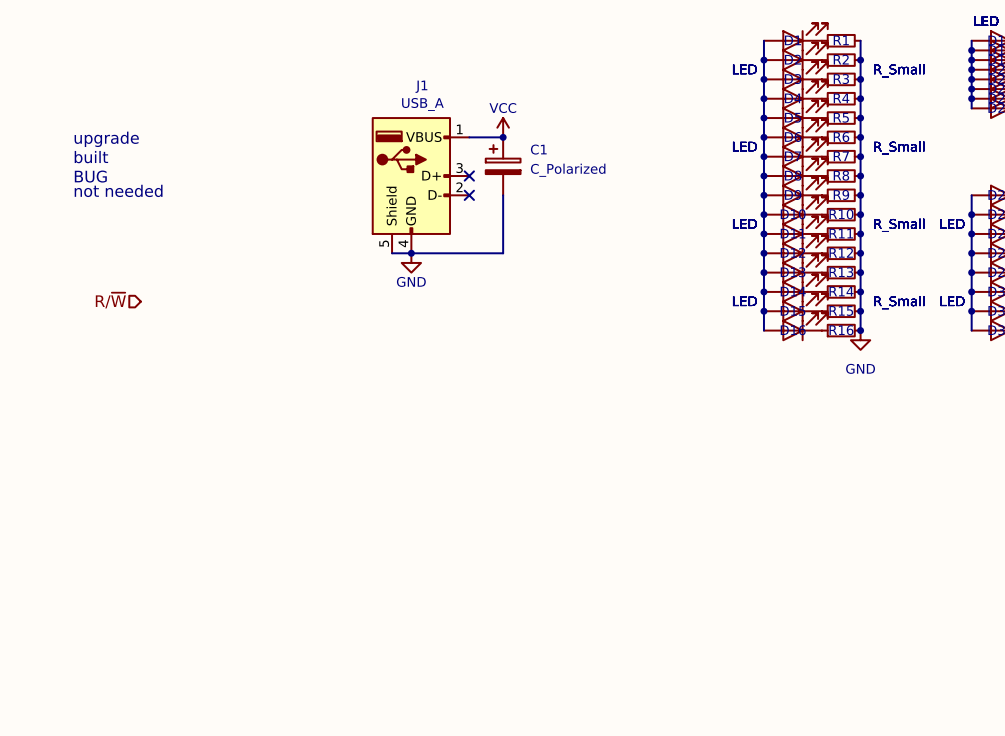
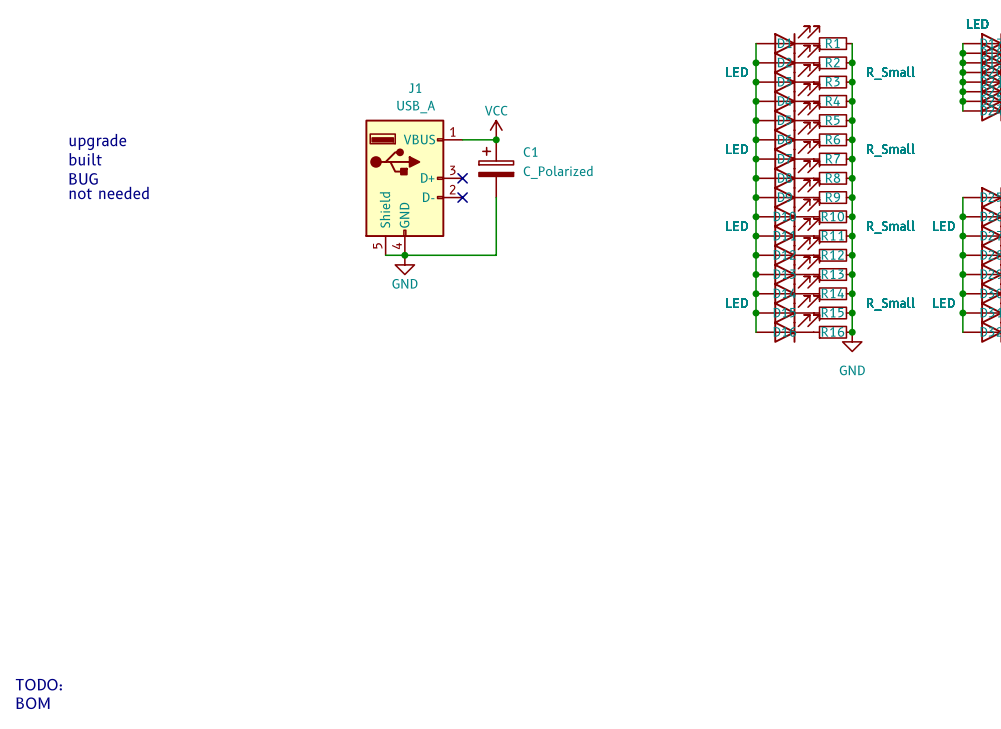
hierarchical label: R/~{W} (110, 300) -> none
text: none -> TODO: (38, 684)
text: none -> BOM (32, 703)

